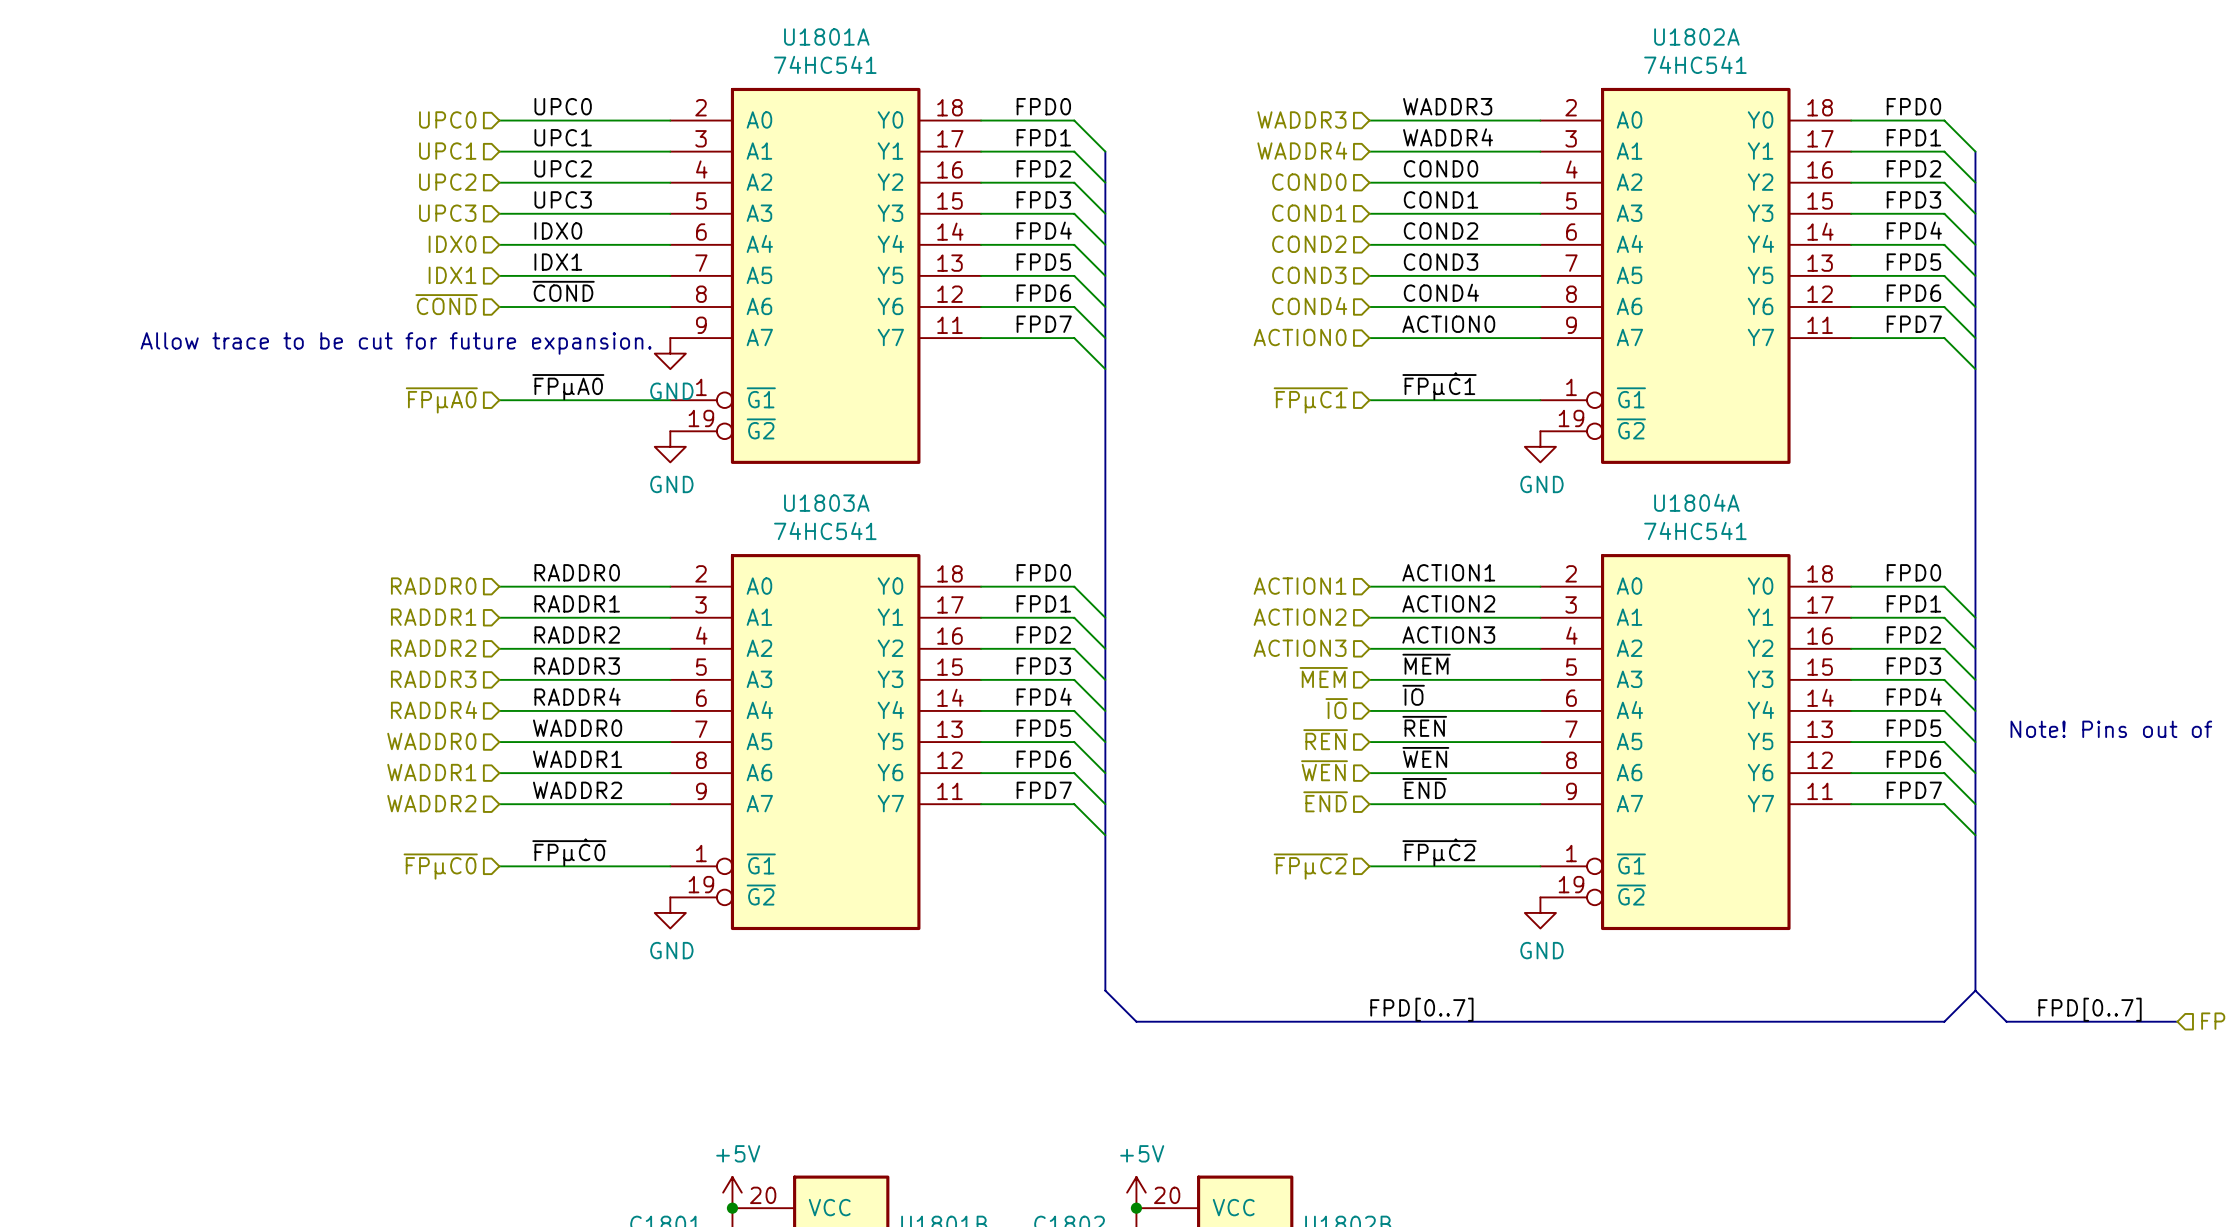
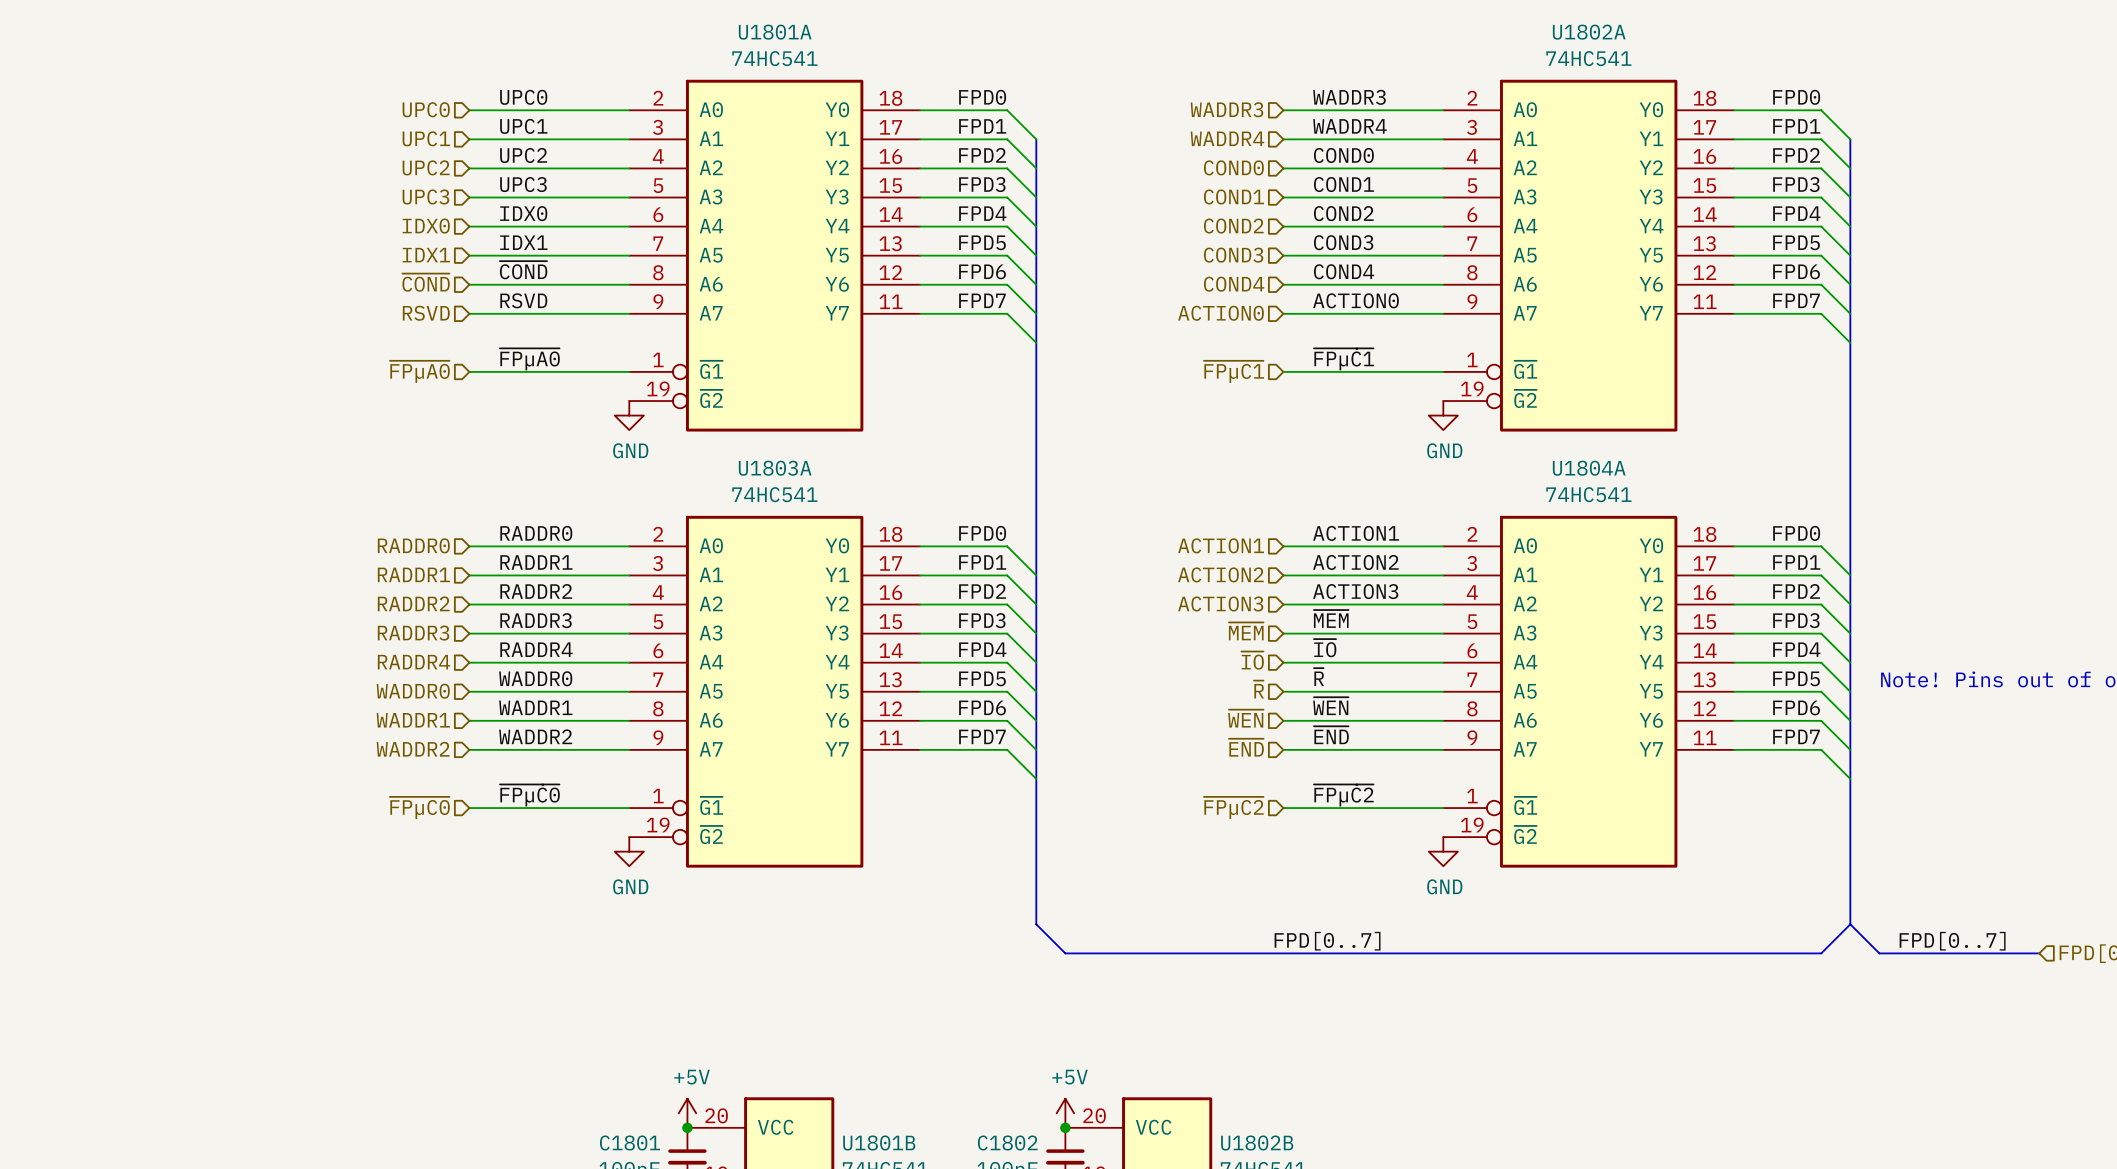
label: none -> RSVD (523, 300)
hierarchical label: none -> RSVD (426, 313)
wire: none -> (469, 313) (629, 313)
text: Allow trace to be cut for future expansion. (396, 343) -> none
power symbol: GND (670, 353) -> none
label: ~{REN} (1424, 726) -> ~{R} (1318, 677)
hierarchical label: ~{REN} (1325, 739) -> ~{R} (1258, 689)

